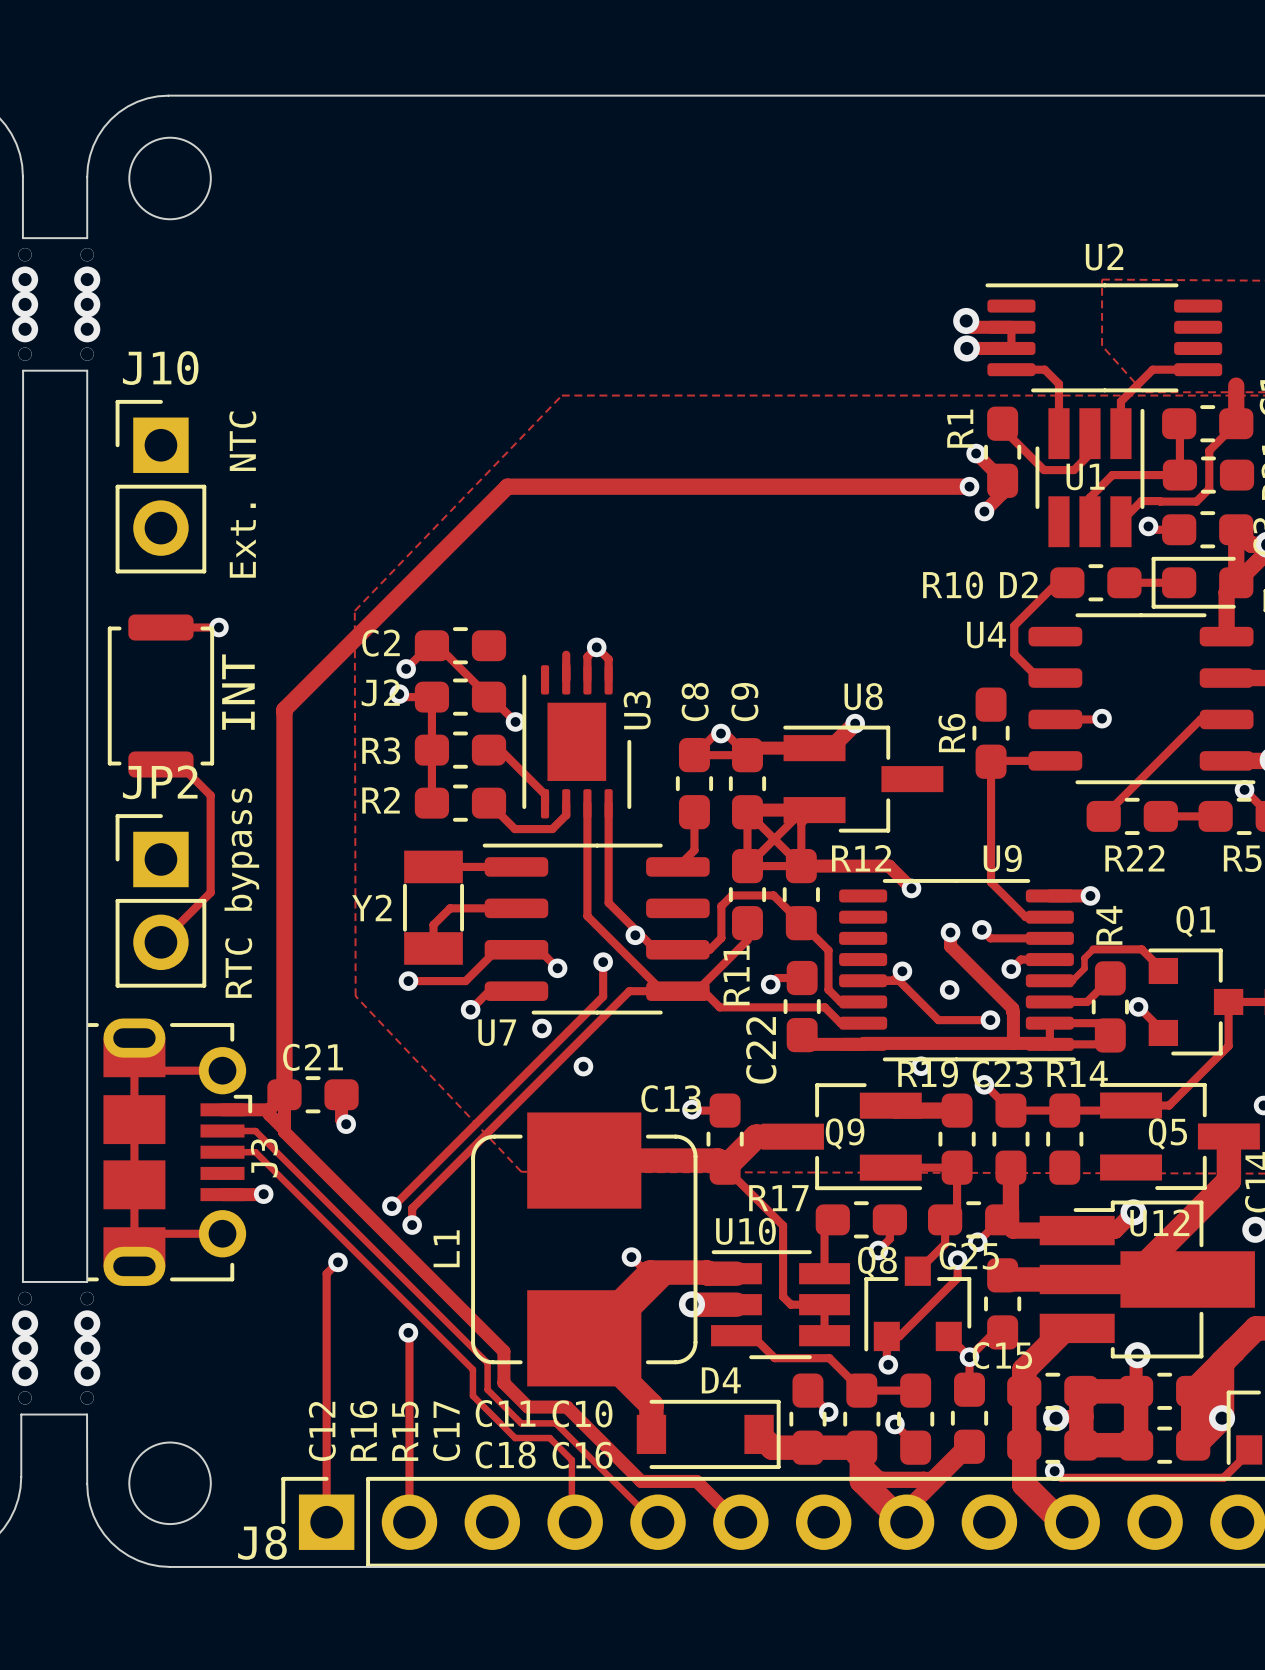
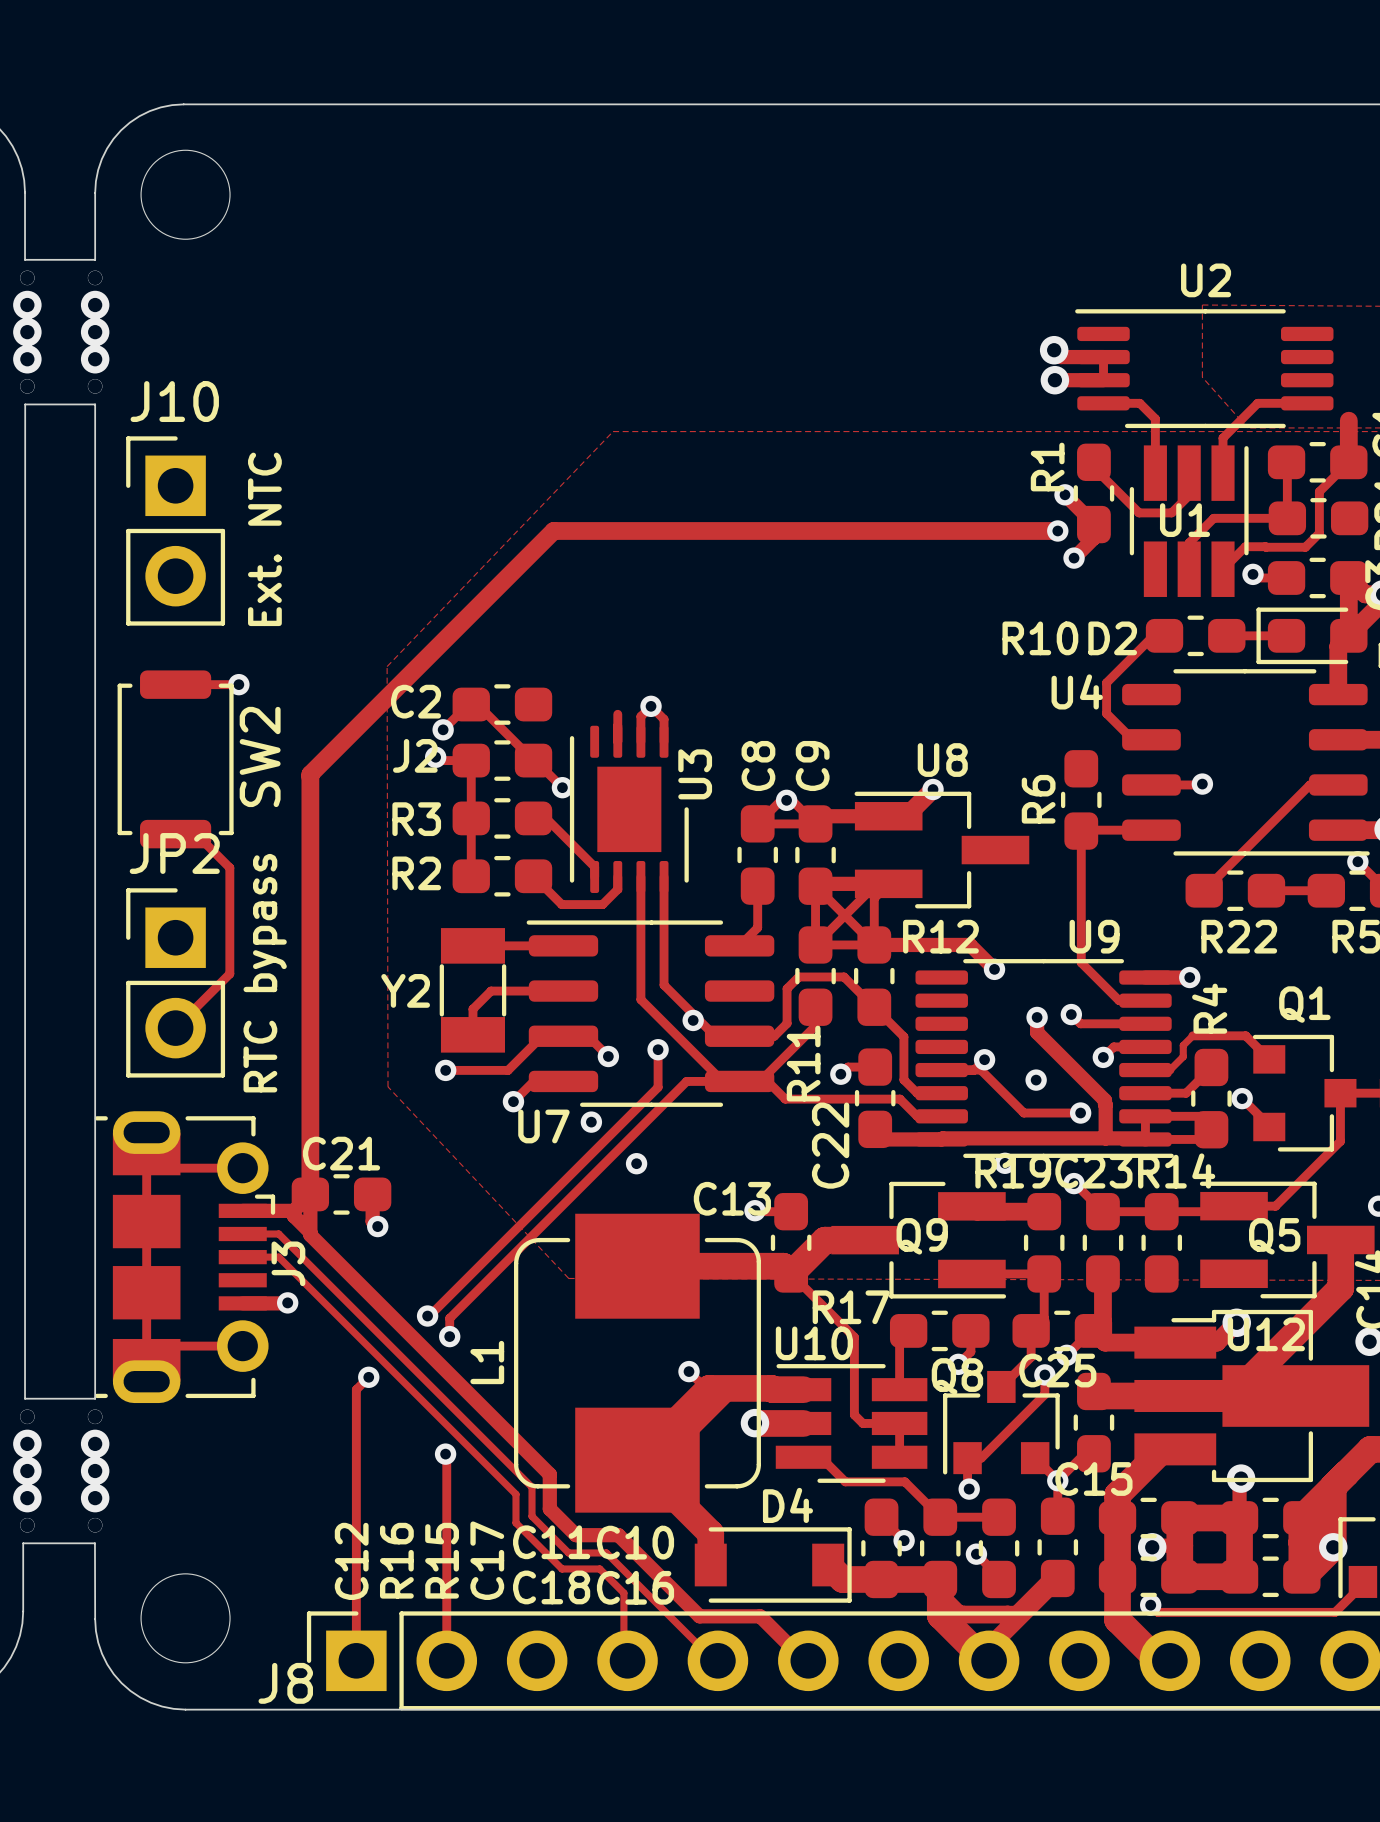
INT name: INT (238, 692) -> SW2 (260, 756)

